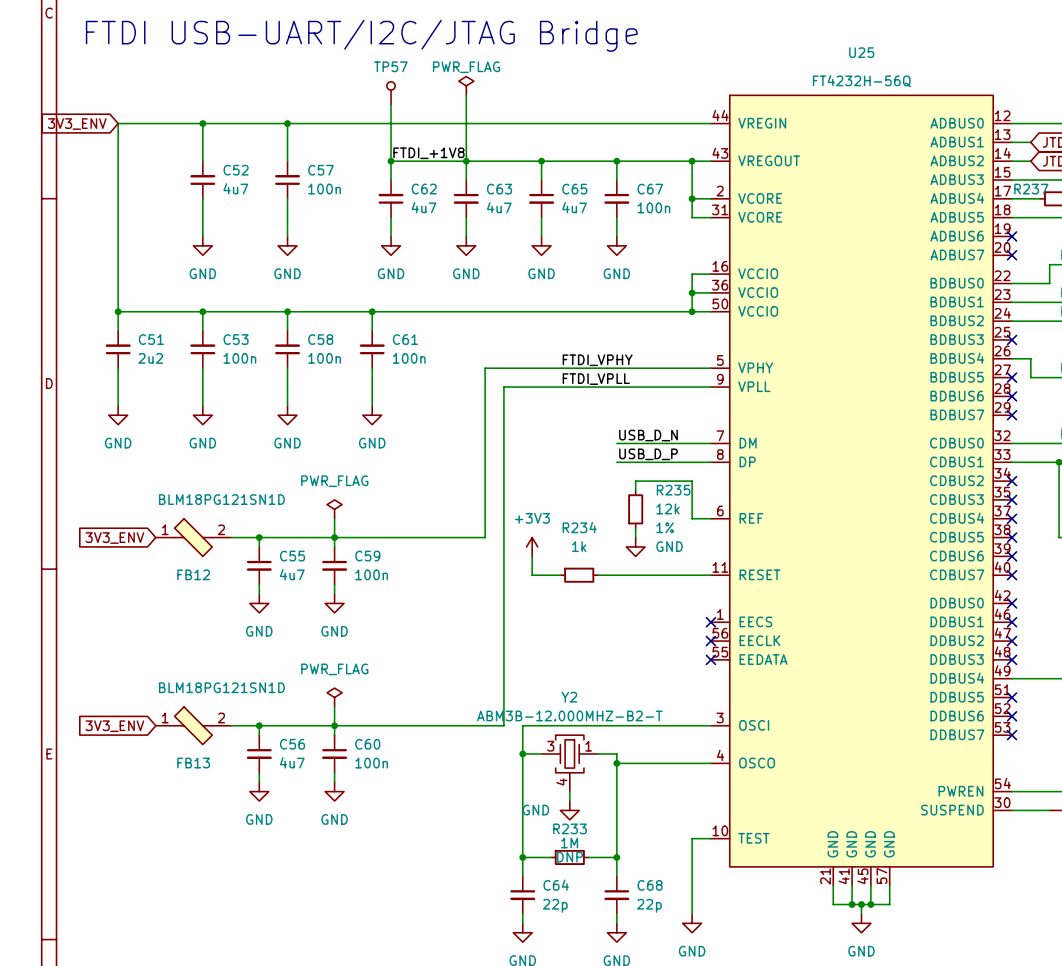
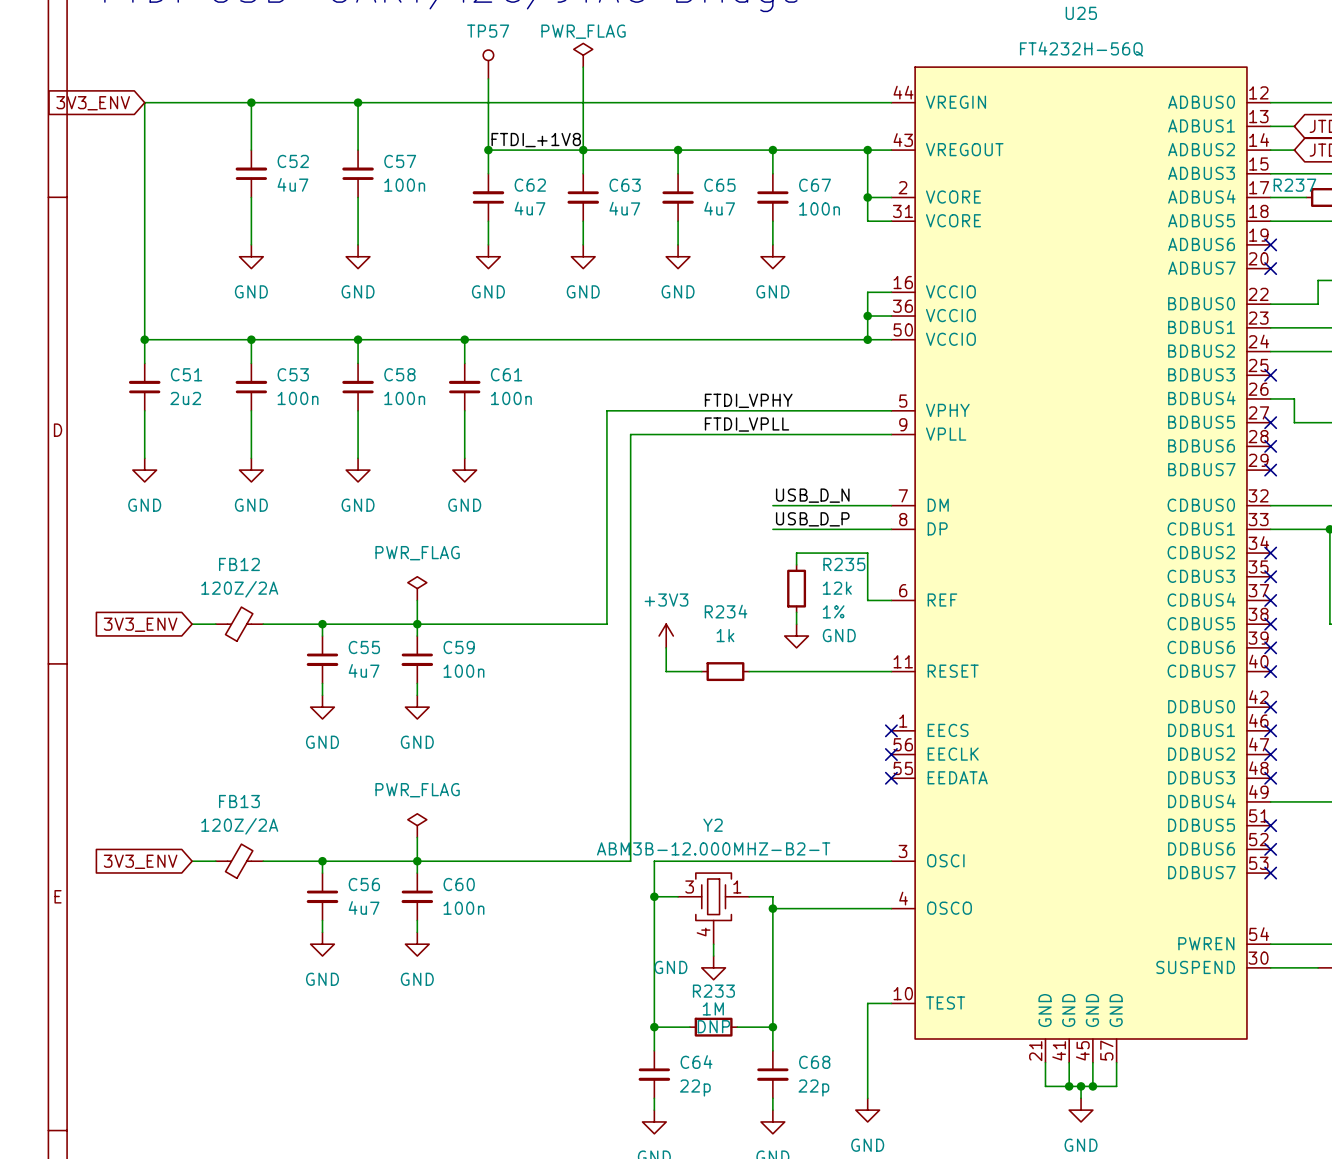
FB12 value: BLM18PG121SN1D (221, 499) -> none
FB12 text: none -> 120Z/2A (239, 589)
FB12 symbol: [155, 518, 232, 557] -> [215, 607, 264, 642]
FB12 name position: FB12 (193, 574) -> FB12 (239, 564)
FB13 value: BLM18PG121SN1D (221, 687) -> none
FB13 text: none -> 120Z/2A (239, 826)
FB13 symbol: [155, 706, 232, 745] -> [215, 844, 264, 879]
FB13 name position: FB13 (193, 763) -> FB13 (239, 801)

